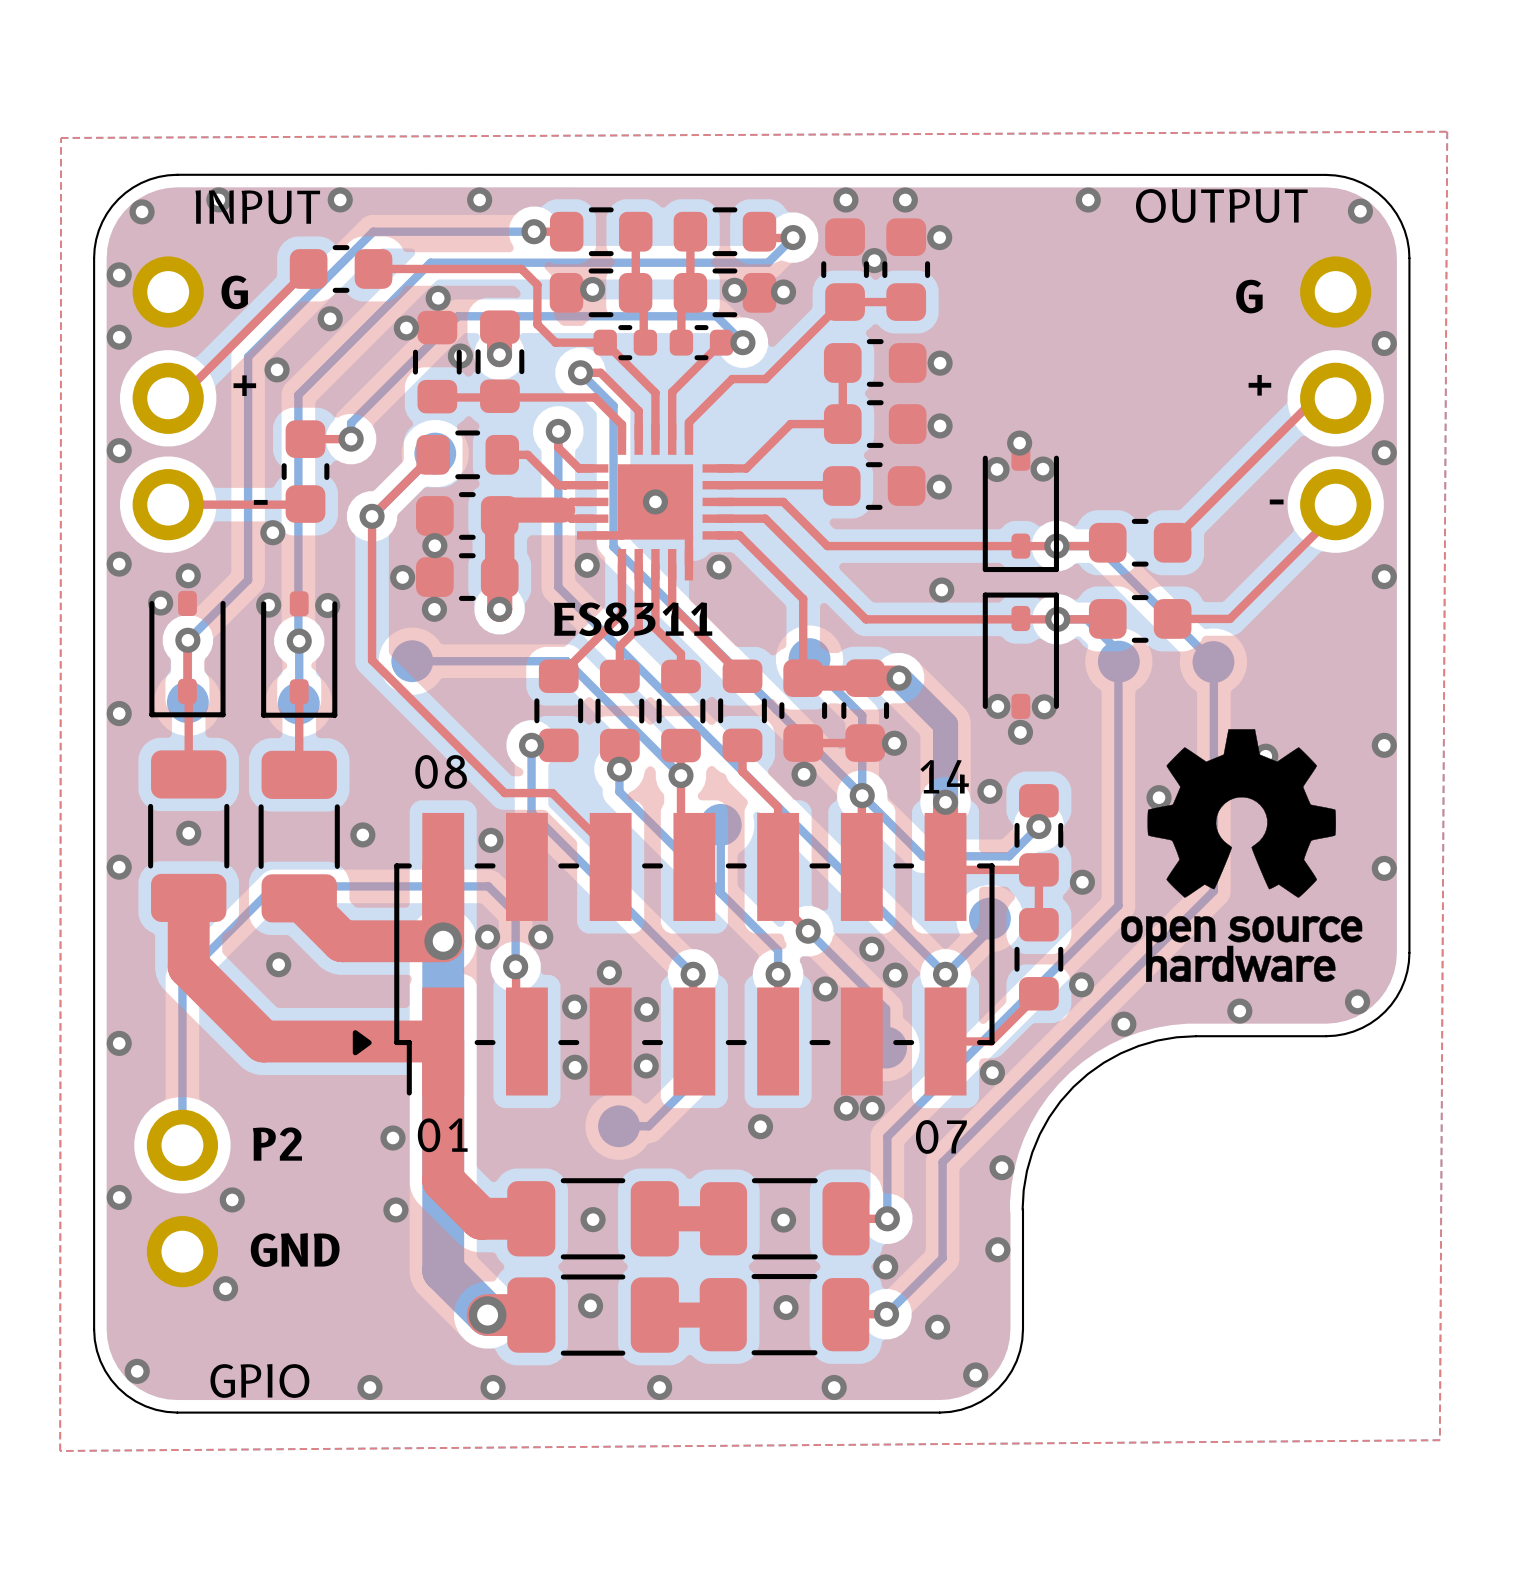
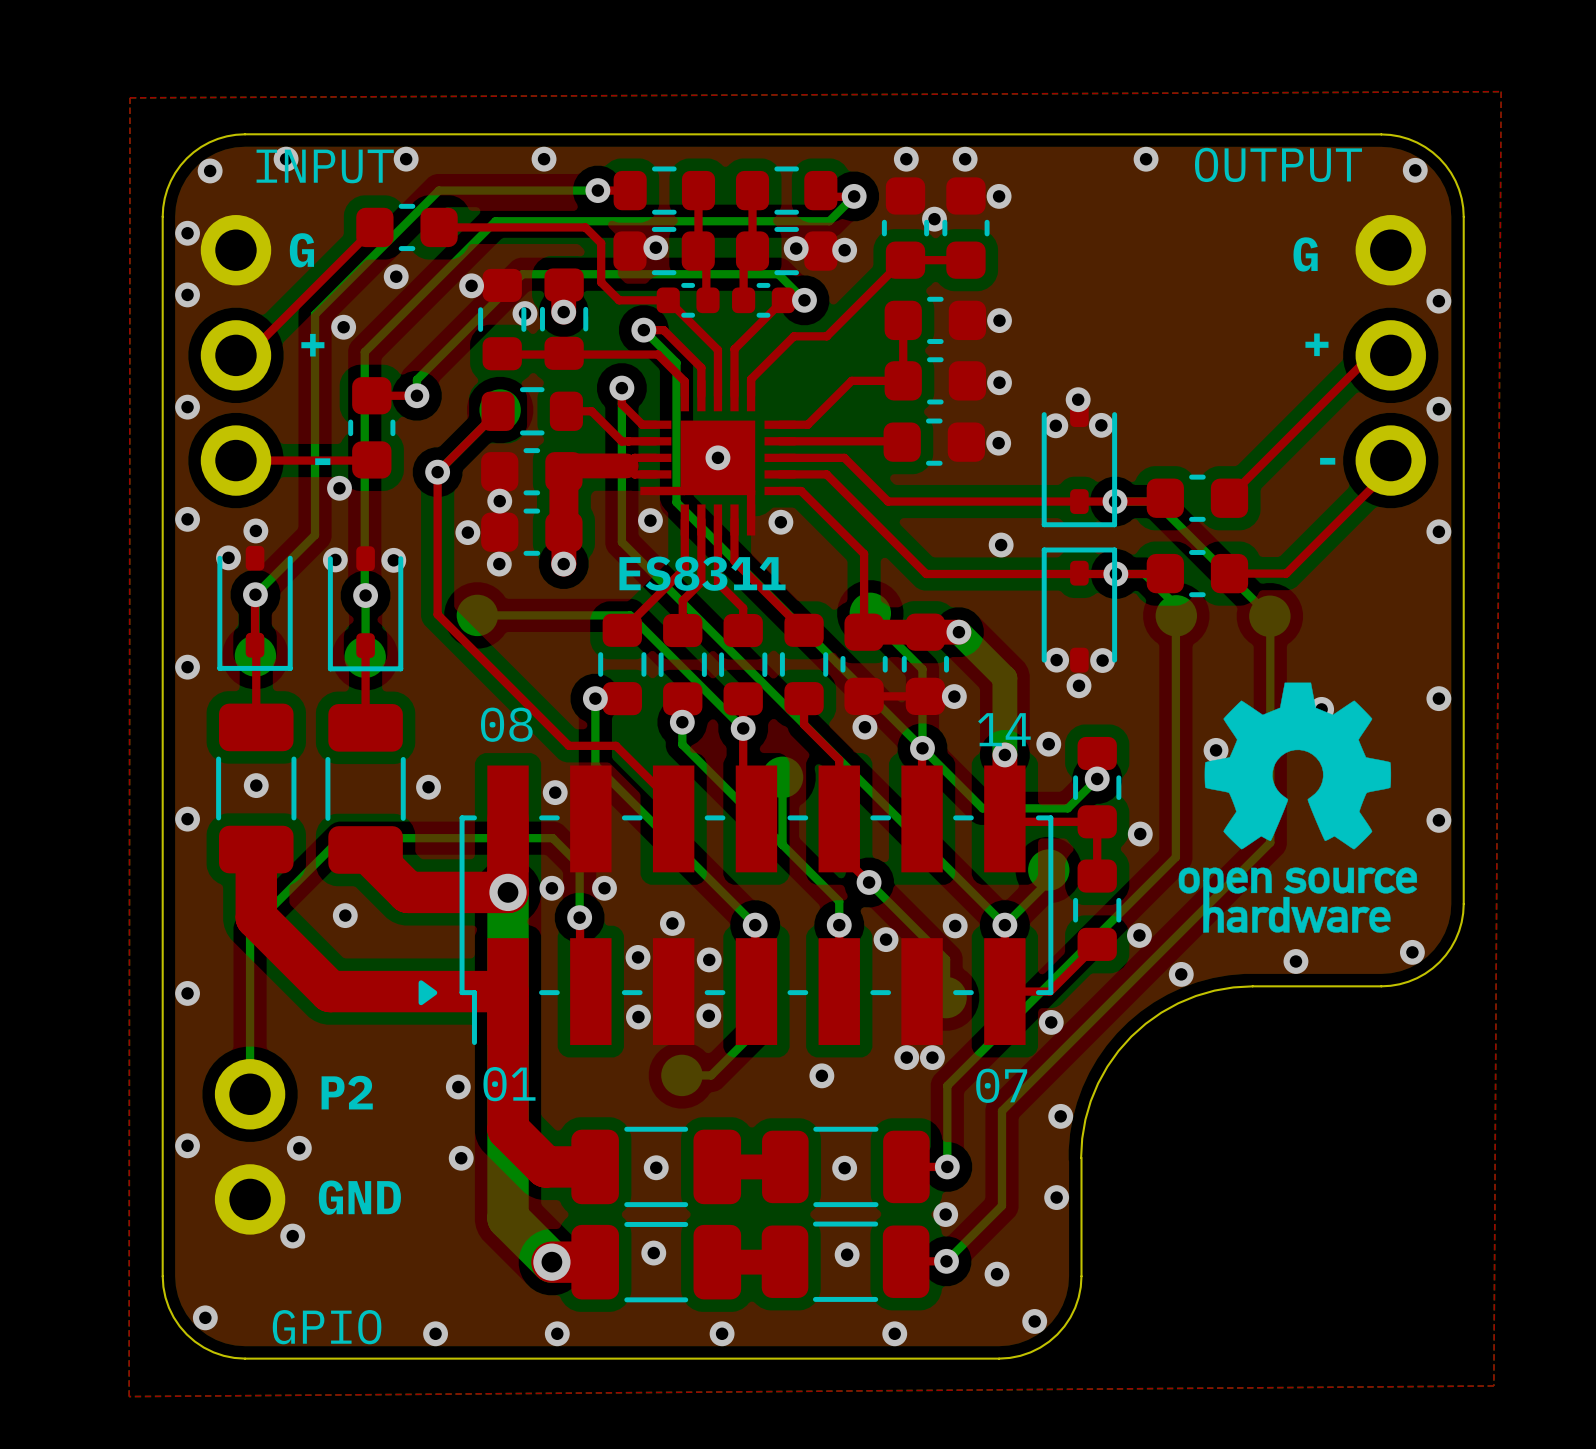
via: (438, 298) -> none
via: (871, 949) -> none

